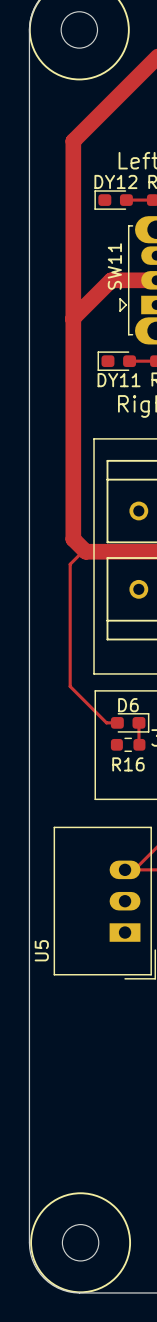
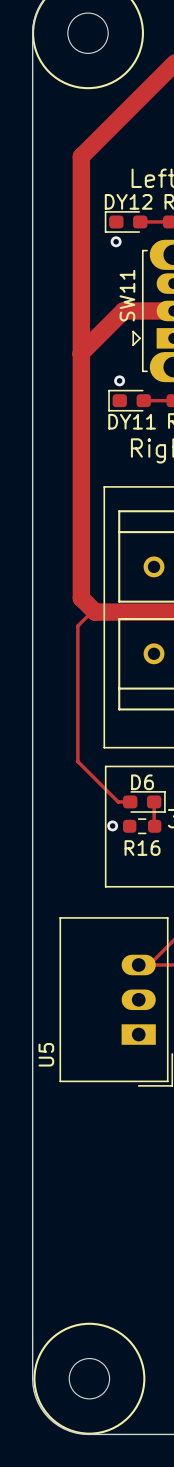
via: none -> (116, 241)
via: none -> (119, 380)
via: none -> (112, 825)

